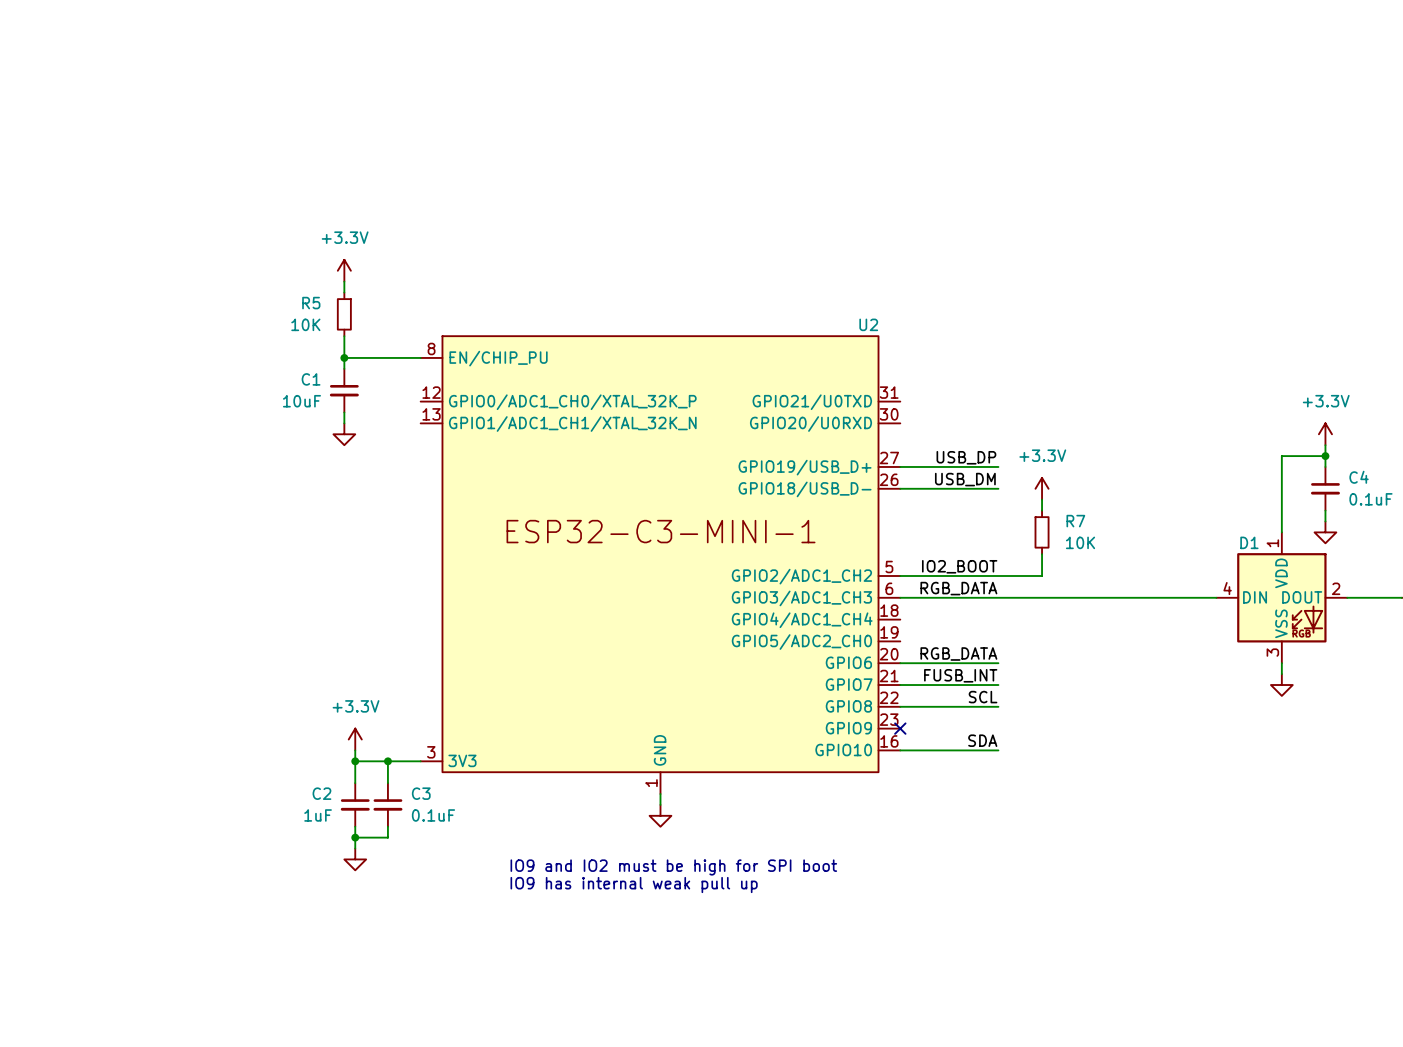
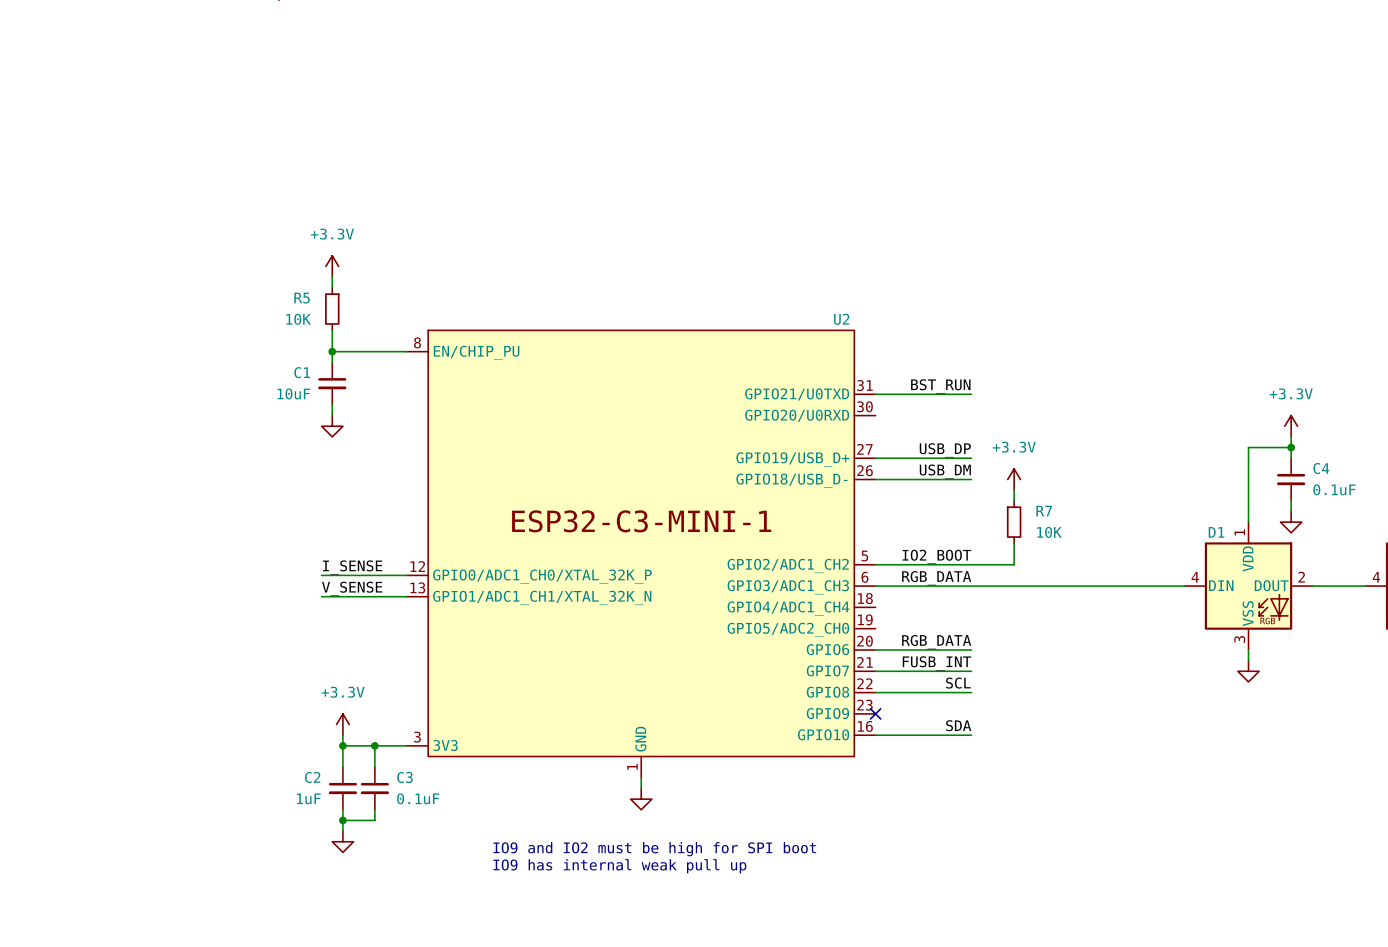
U2 symbol: [420, 336, 901, 795] -> [406, 330, 876, 778]
label: none -> BST_RUN (940, 386)
wire: none -> (875, 394) (971, 394)
label: none -> I_SENSE (352, 567)
wire: none -> (321, 575) (406, 575)
label: none -> V_SENSE (352, 588)
wire: none -> (321, 596) (406, 596)

